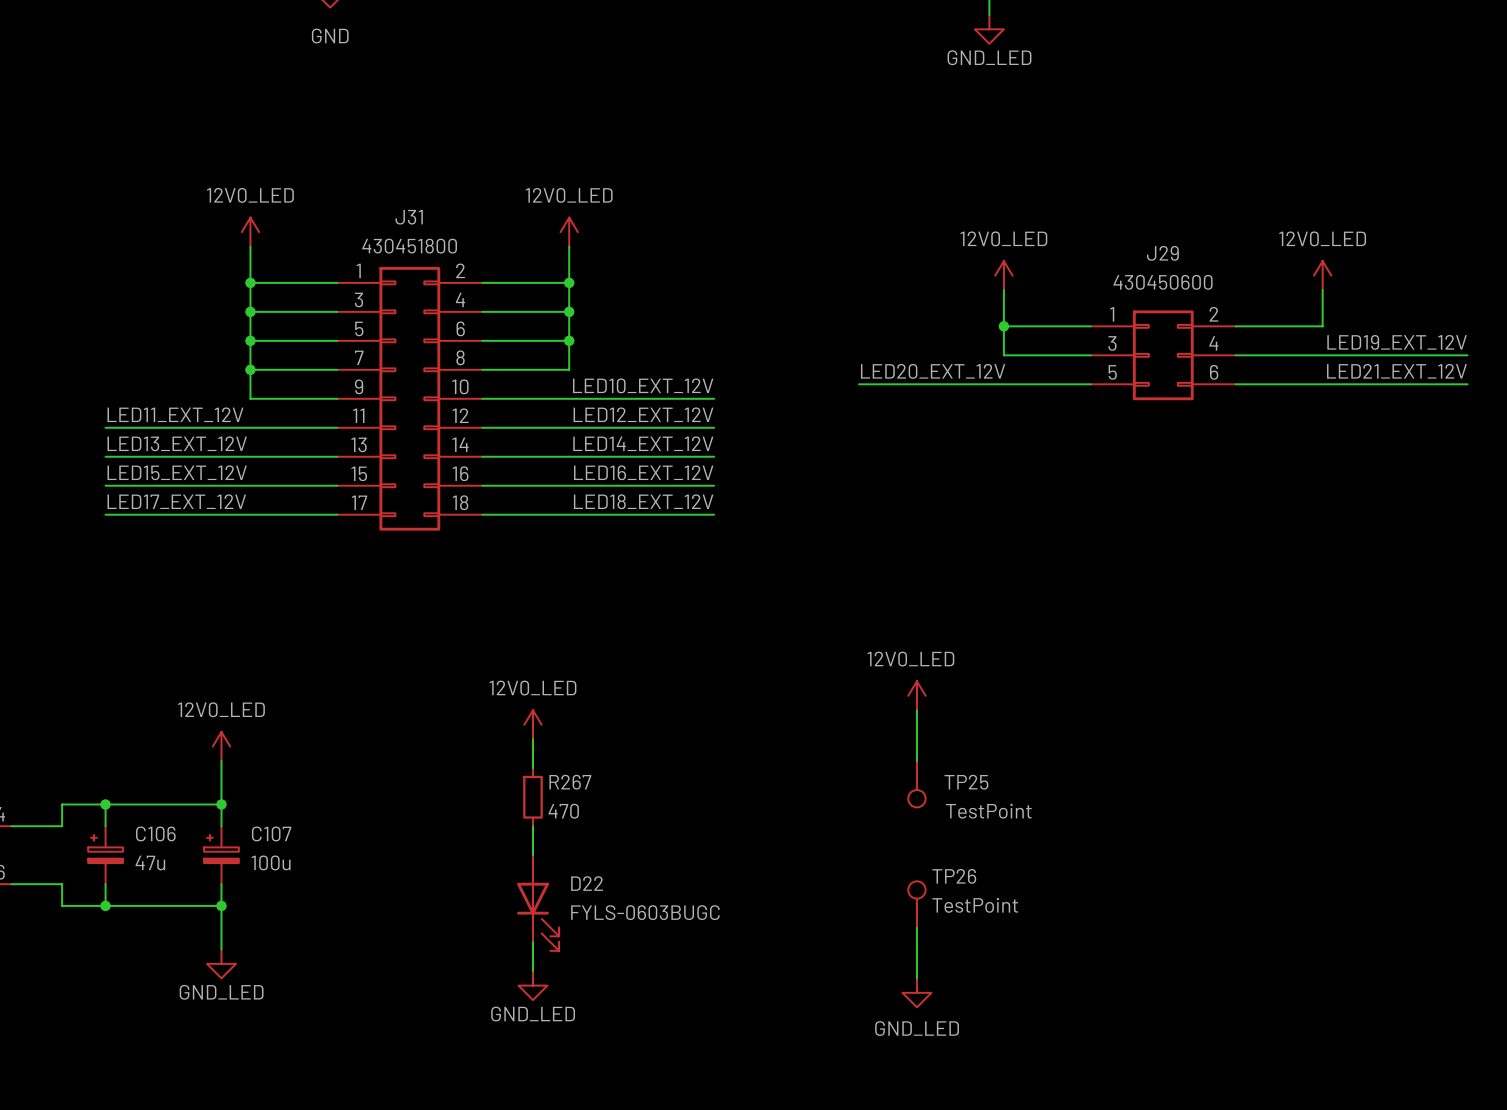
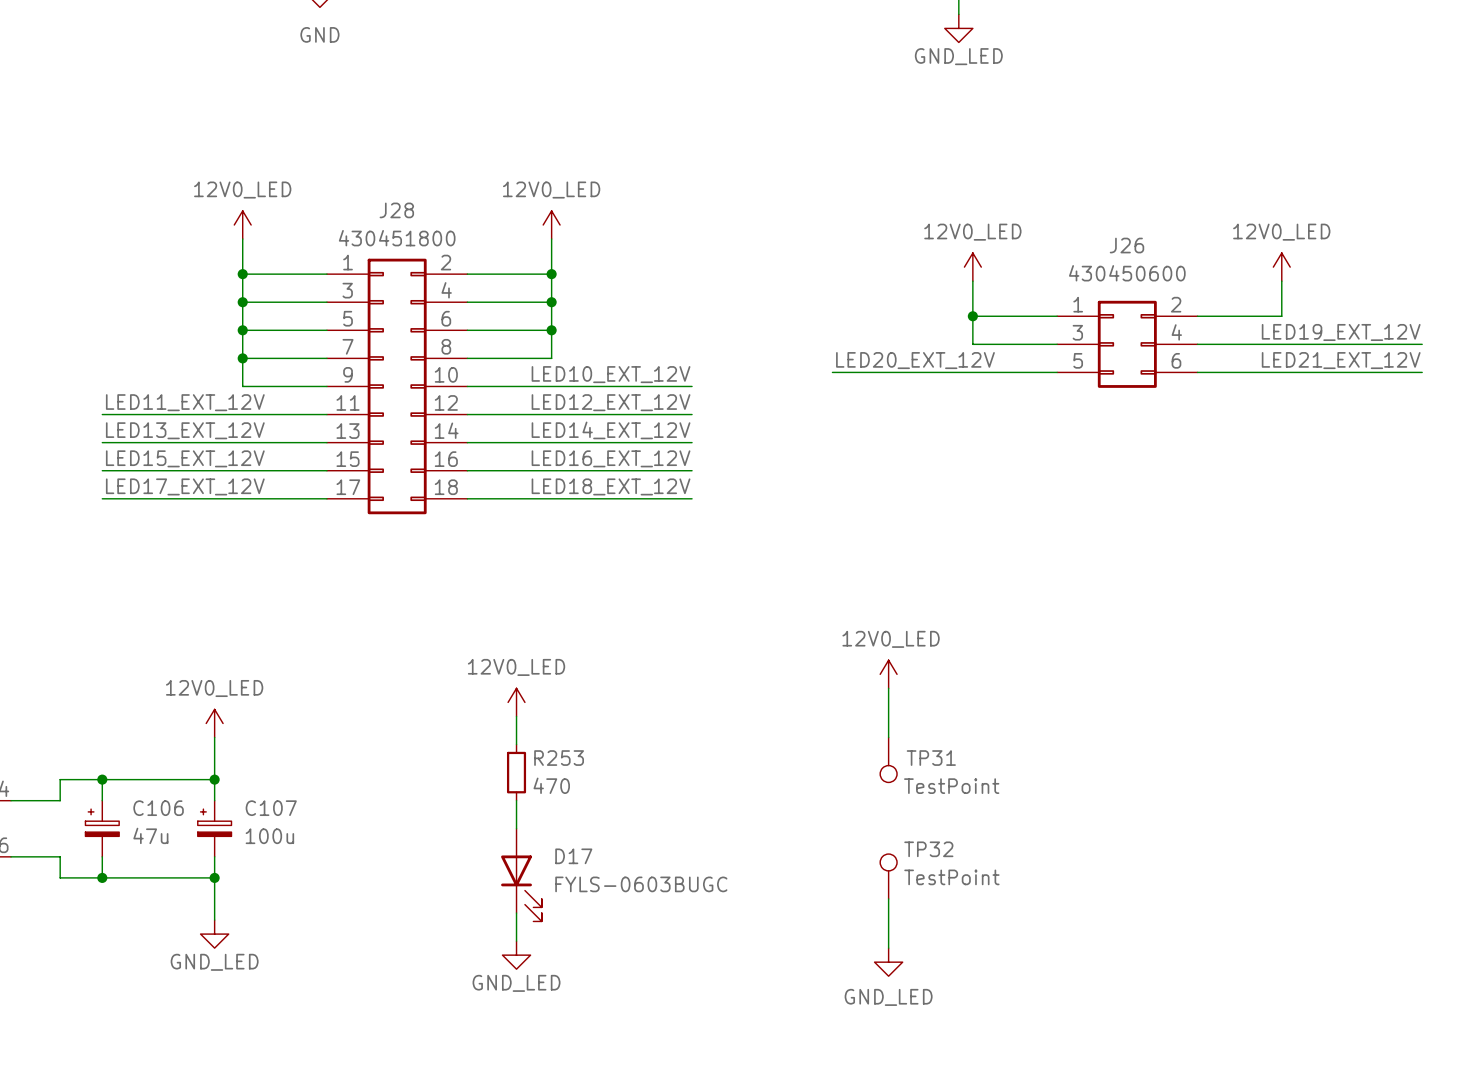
J31 name: J31 (409, 217) -> J28 (396, 210)
J29 name: J29 (1162, 253) -> J26 (1126, 245)
R267 name: R267 (570, 782) -> R253 (559, 758)
TP25 name: TP25 (966, 782) -> TP31 (931, 758)
TP26 name: TP26 (954, 876) -> TP32 (928, 849)
D22 name: D22 (587, 883) -> D17 (573, 856)

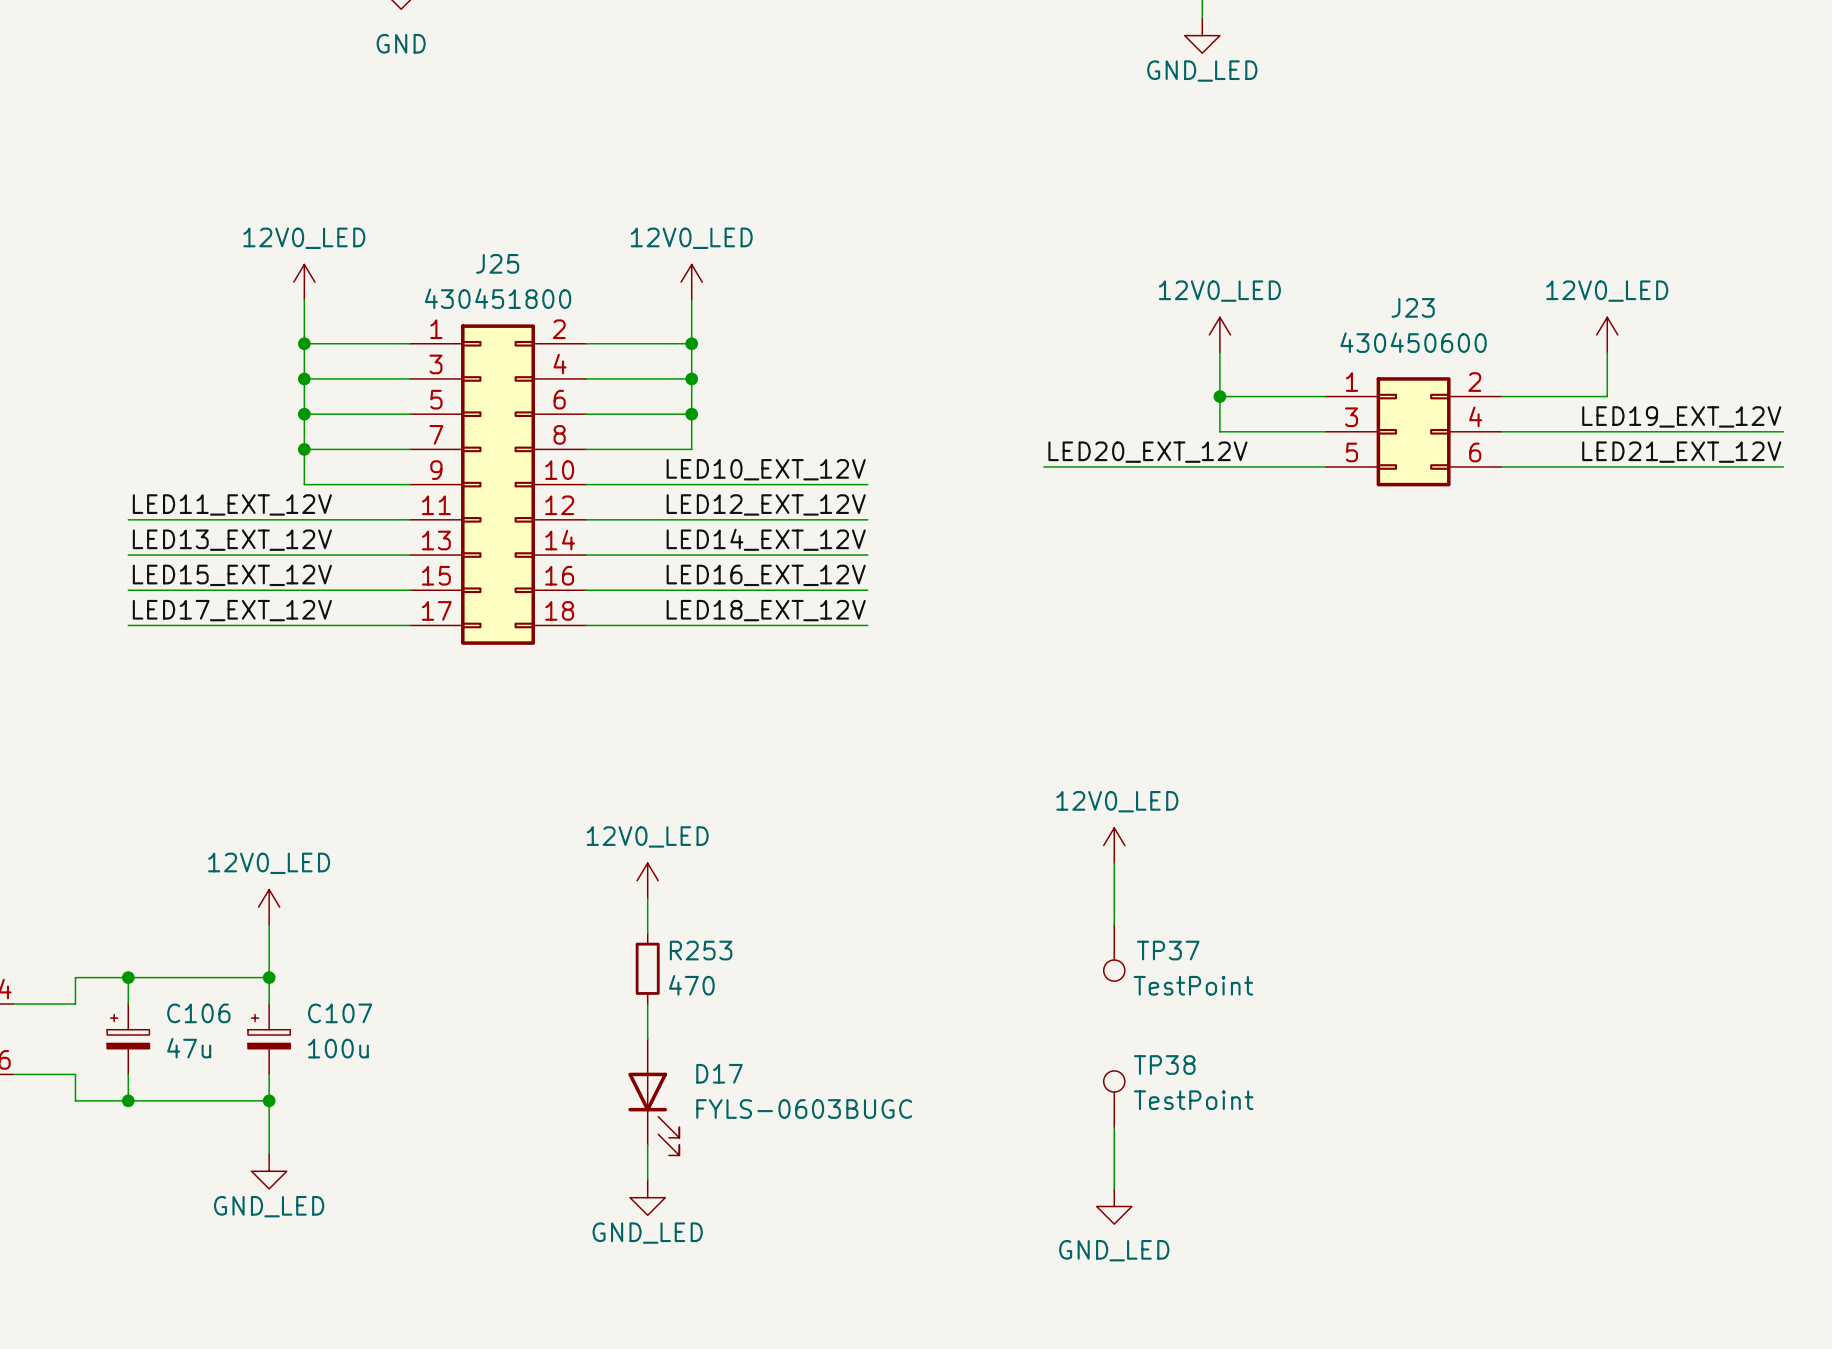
J28 name: J28 (396, 210) -> J25 (497, 263)
J26 name: J26 (1126, 245) -> J23 (1413, 307)
TP31 name: TP31 (931, 758) -> TP37 (1168, 950)
TP32 name: TP32 (928, 849) -> TP38 (1164, 1064)

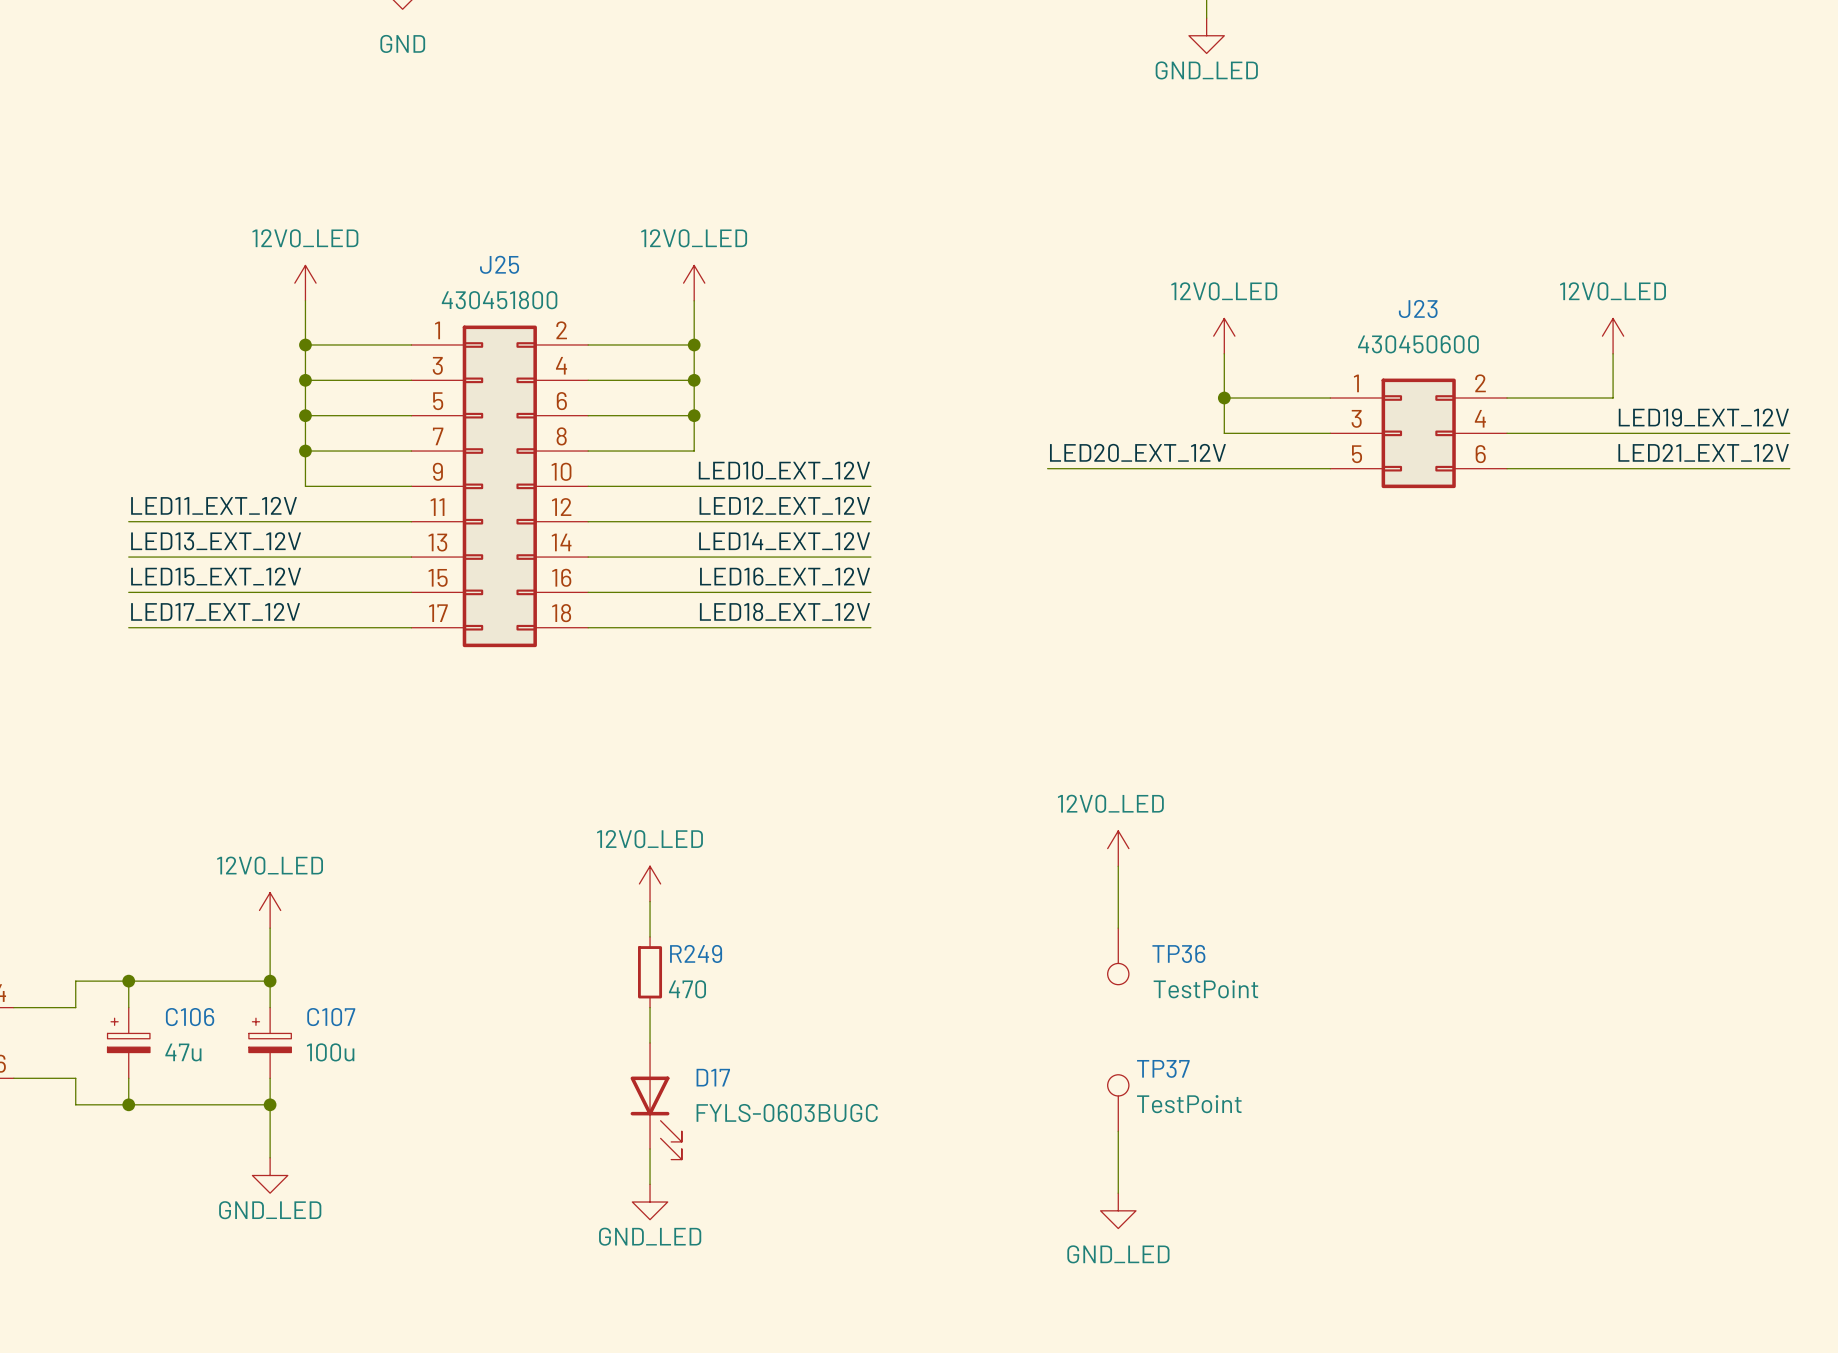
R253 name: R253 (701, 950) -> R249 (696, 953)
TP37 name: TP37 (1168, 950) -> TP36 (1178, 953)
TP38 name: TP38 (1164, 1064) -> TP37 (1163, 1068)

